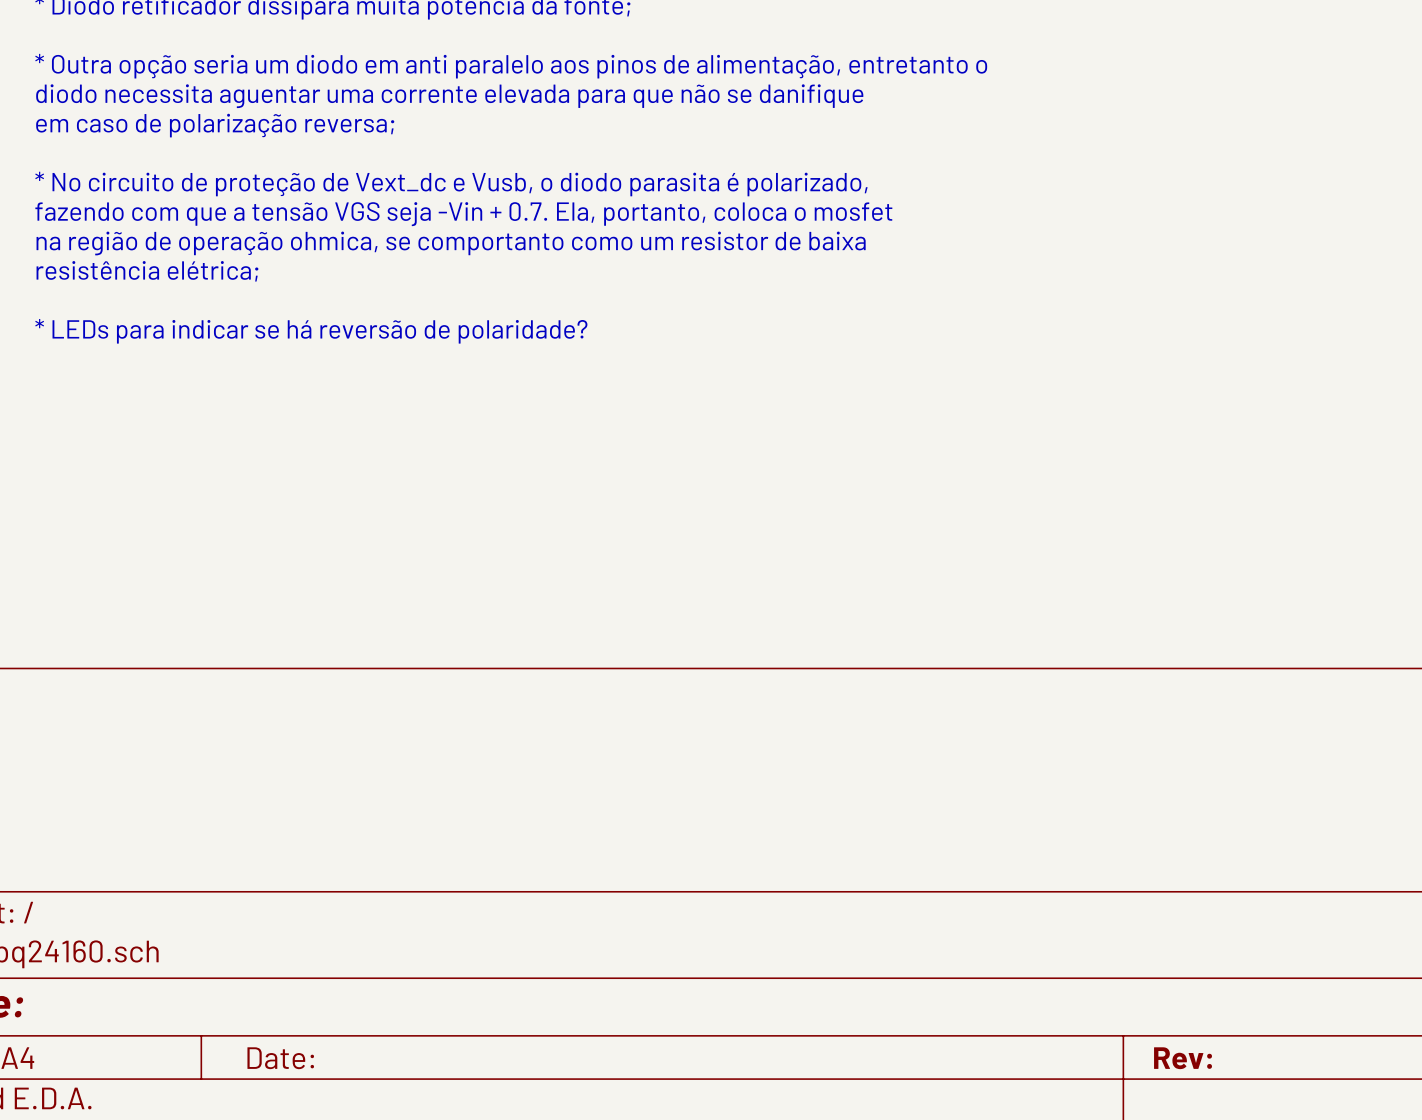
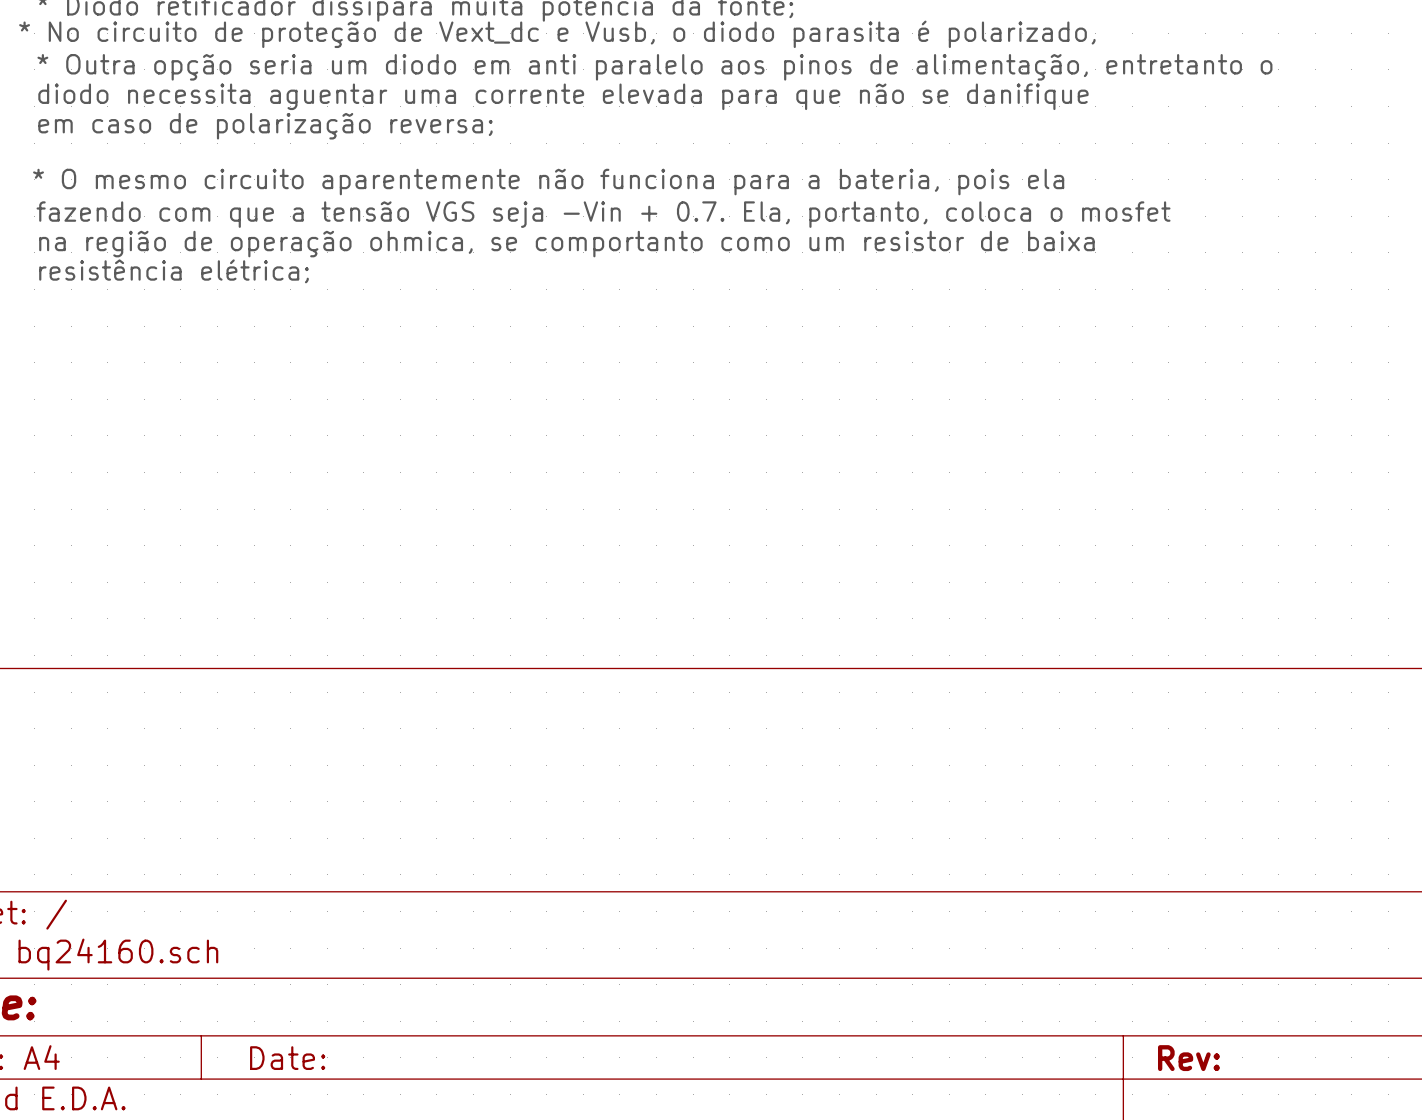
text: none -> * O mesmo circuito aparentemente não funciona para a bateria, pois ela (548, 182)
text position: * No circuito de proteção de Vext_dc e Vusb, o diodo parasita é polarizado, (451, 184) -> * No circuito de proteção de Vext_dc e Vusb, o diodo parasita é polarizado, (557, 34)
text: * LEDs para indicar se há reversão de polaridade? (311, 331) -> none

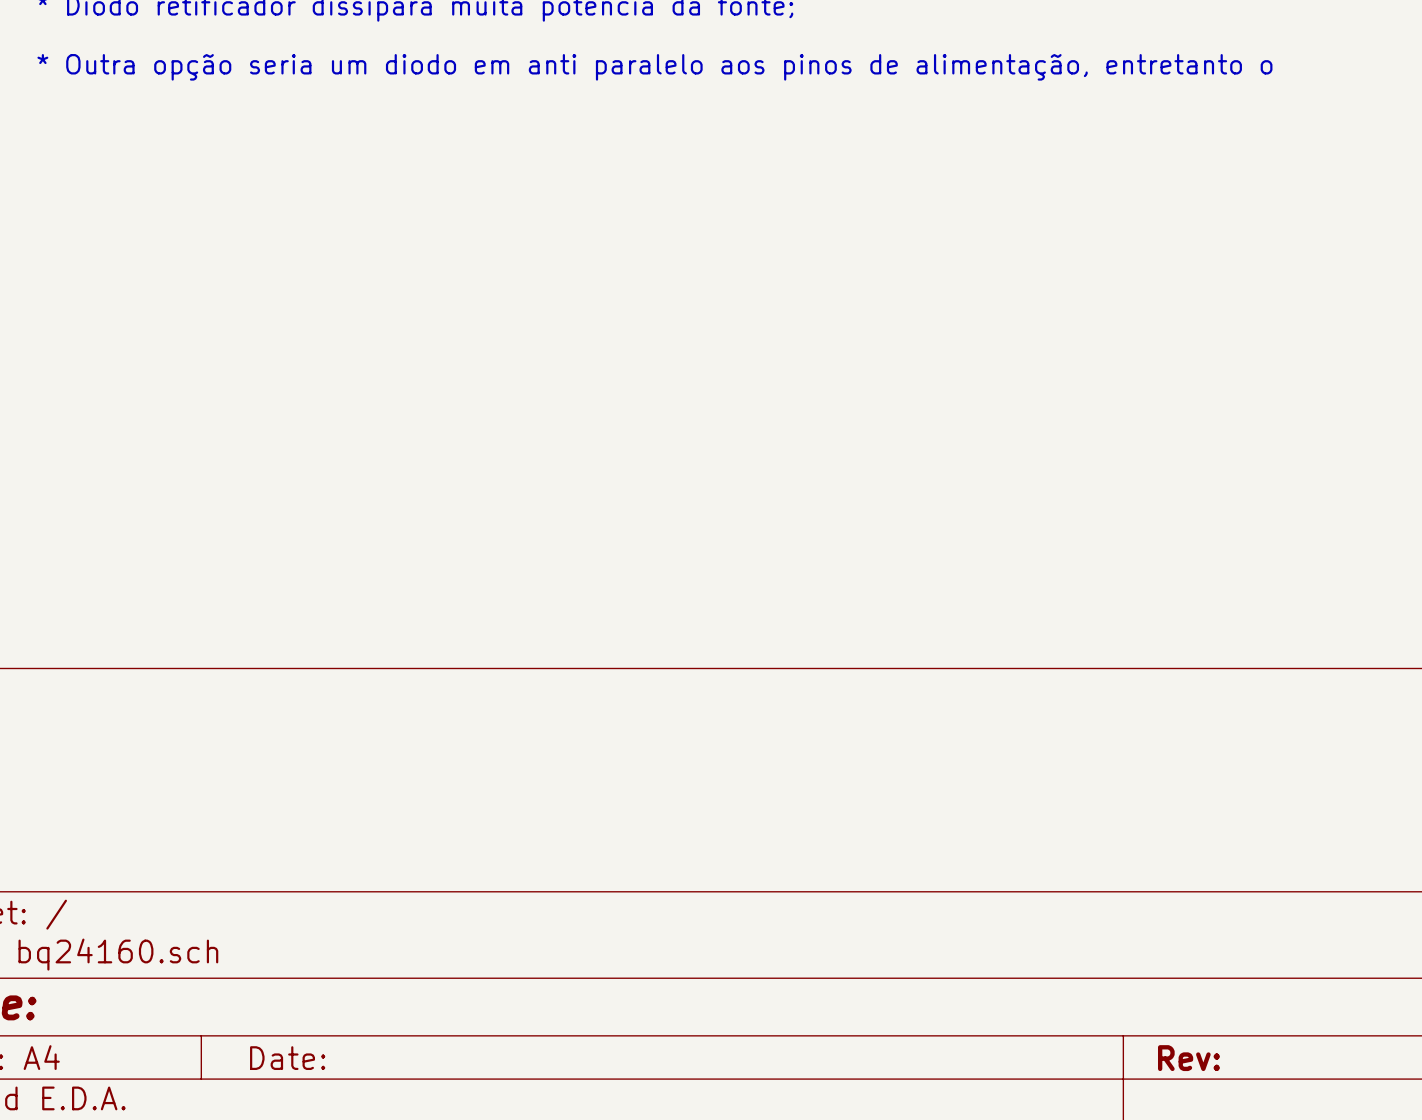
text: * No circuito de proteção de Vext_dc e Vusb, o diodo parasita é polarizado, (557, 34) -> none
text: diodo necessita aguentar uma corrente elevada para que não se danifique (563, 96) -> none
text: em caso de polarização reversa; (265, 126) -> none
text: * O mesmo circuito aparentemente não funciona para a bateria, pois ela (548, 182) -> none
text: fazendo com que a tensão VGS seja -Vin + 0.7. Ela, portanto, coloca o mosfet (603, 214) -> none
text: na região de operação ohmica, se comportanto como um resistor de baixa (566, 244) -> none
text: resistência elétrica; (174, 271) -> none

